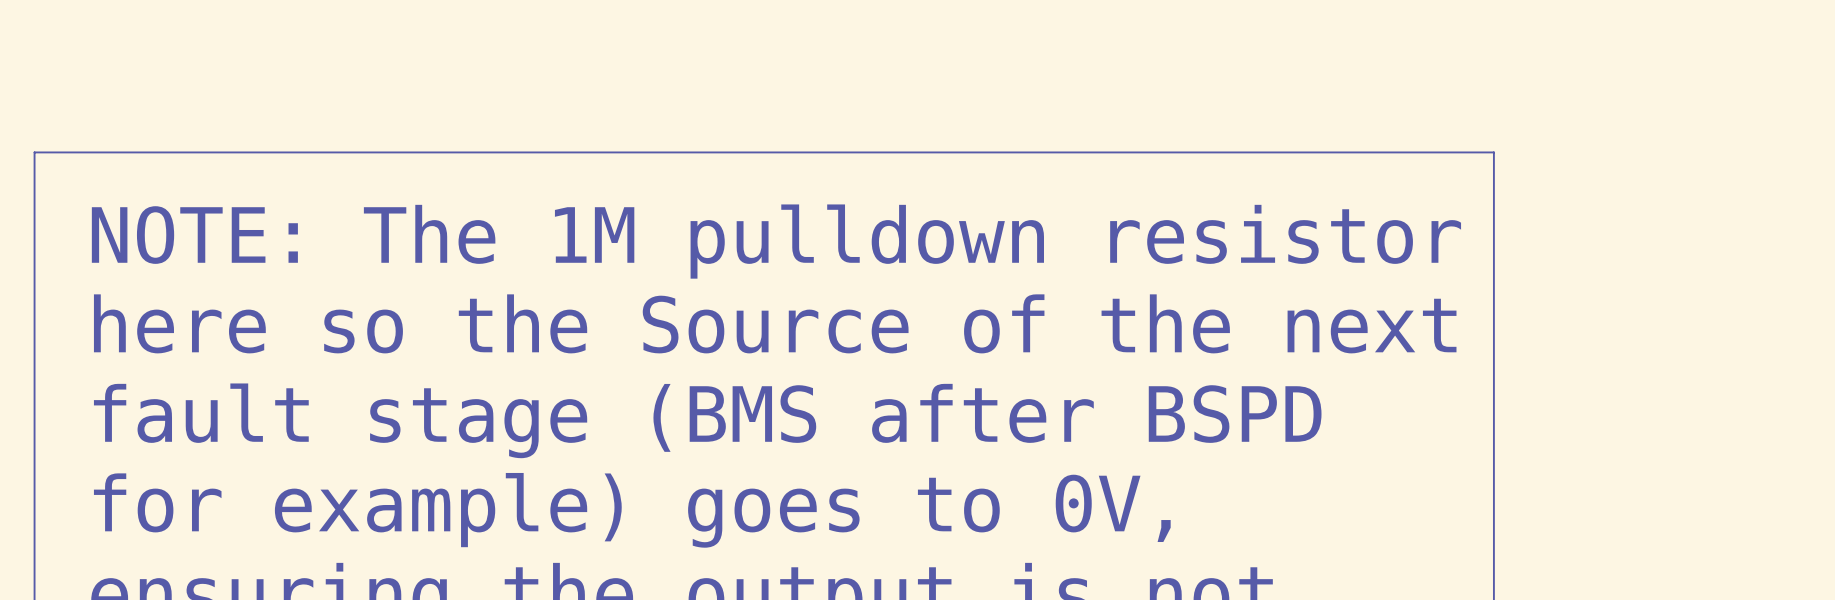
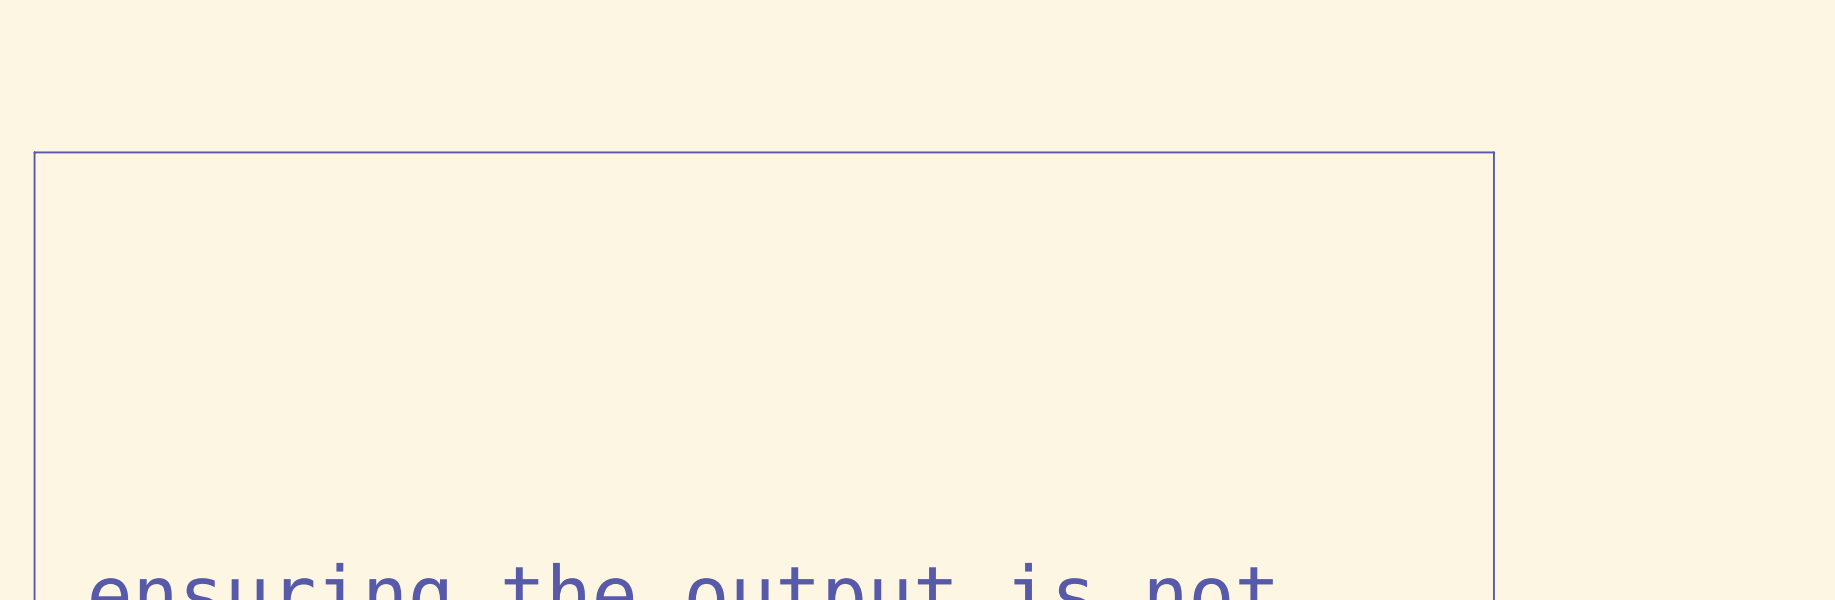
text: NOTE: The 1M pulldown resistor (776, 241) -> none
text: here so the Source of the next (775, 323) -> none
text: fault stage (BMS after BSPD (707, 420) -> none
text: for example) goes to 0V, (632, 510) -> none

